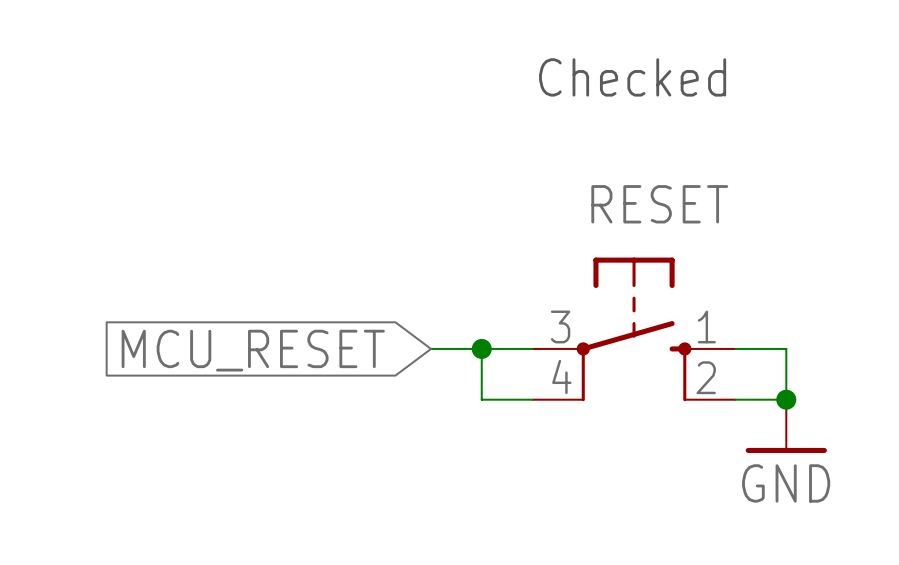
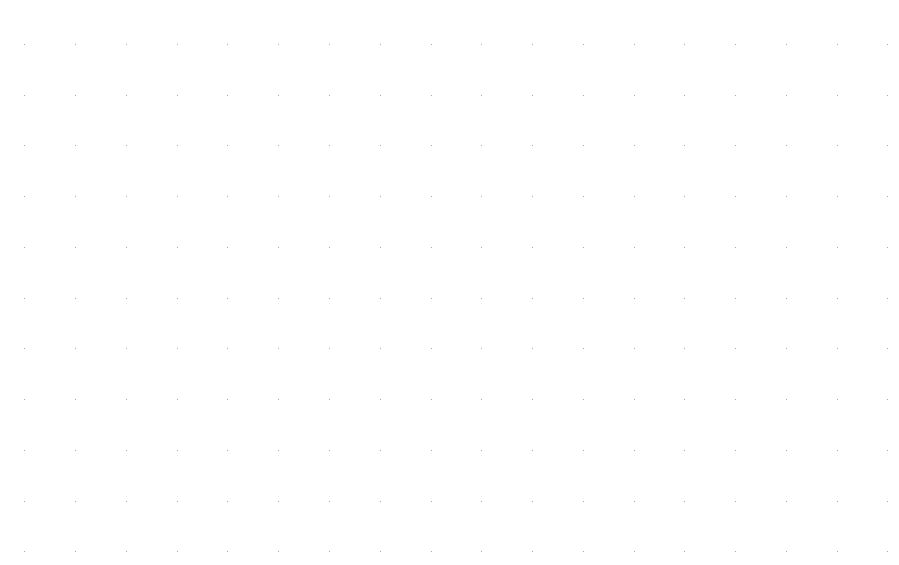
text: Checked (632, 77) -> none
RESET: (634, 329) -> none
wire: (431, 348) (532, 348) -> none
wire: (481, 348) (481, 399) (532, 399) -> none
junction: (481, 348) -> none
wire: (735, 348) (786, 348) (786, 399) (735, 399) -> none
global label: MCU_RESET (253, 350) -> none
junction: (786, 399) -> none
power symbol: GND (786, 426) -> none

